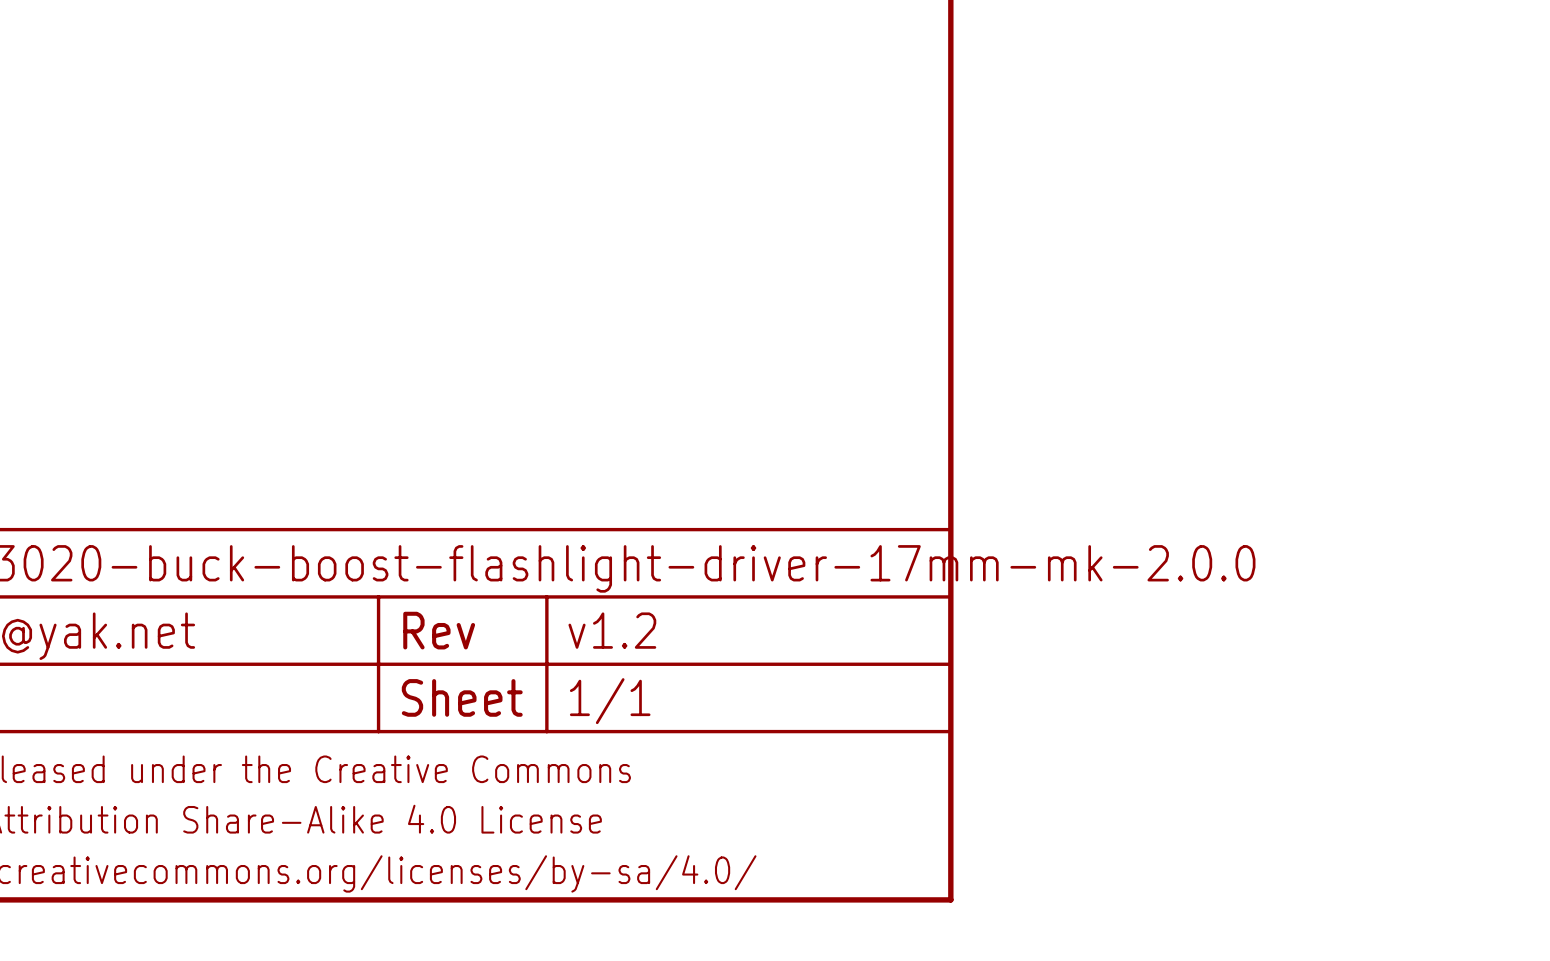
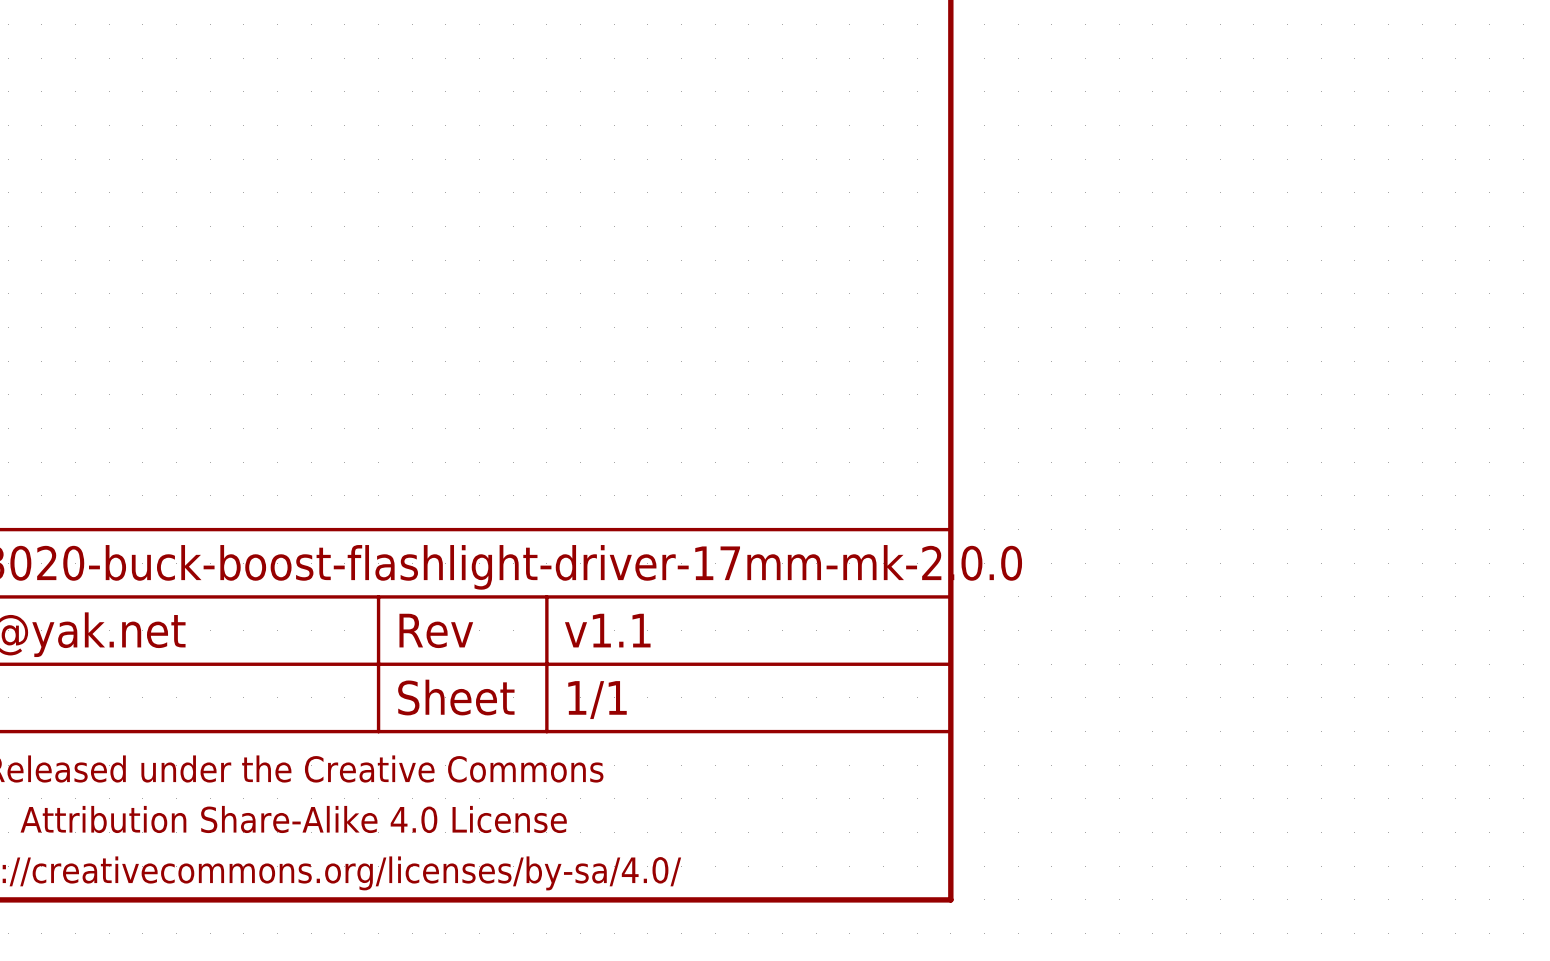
part text: v1.2 (612, 630) -> v1.1 (607, 630)

